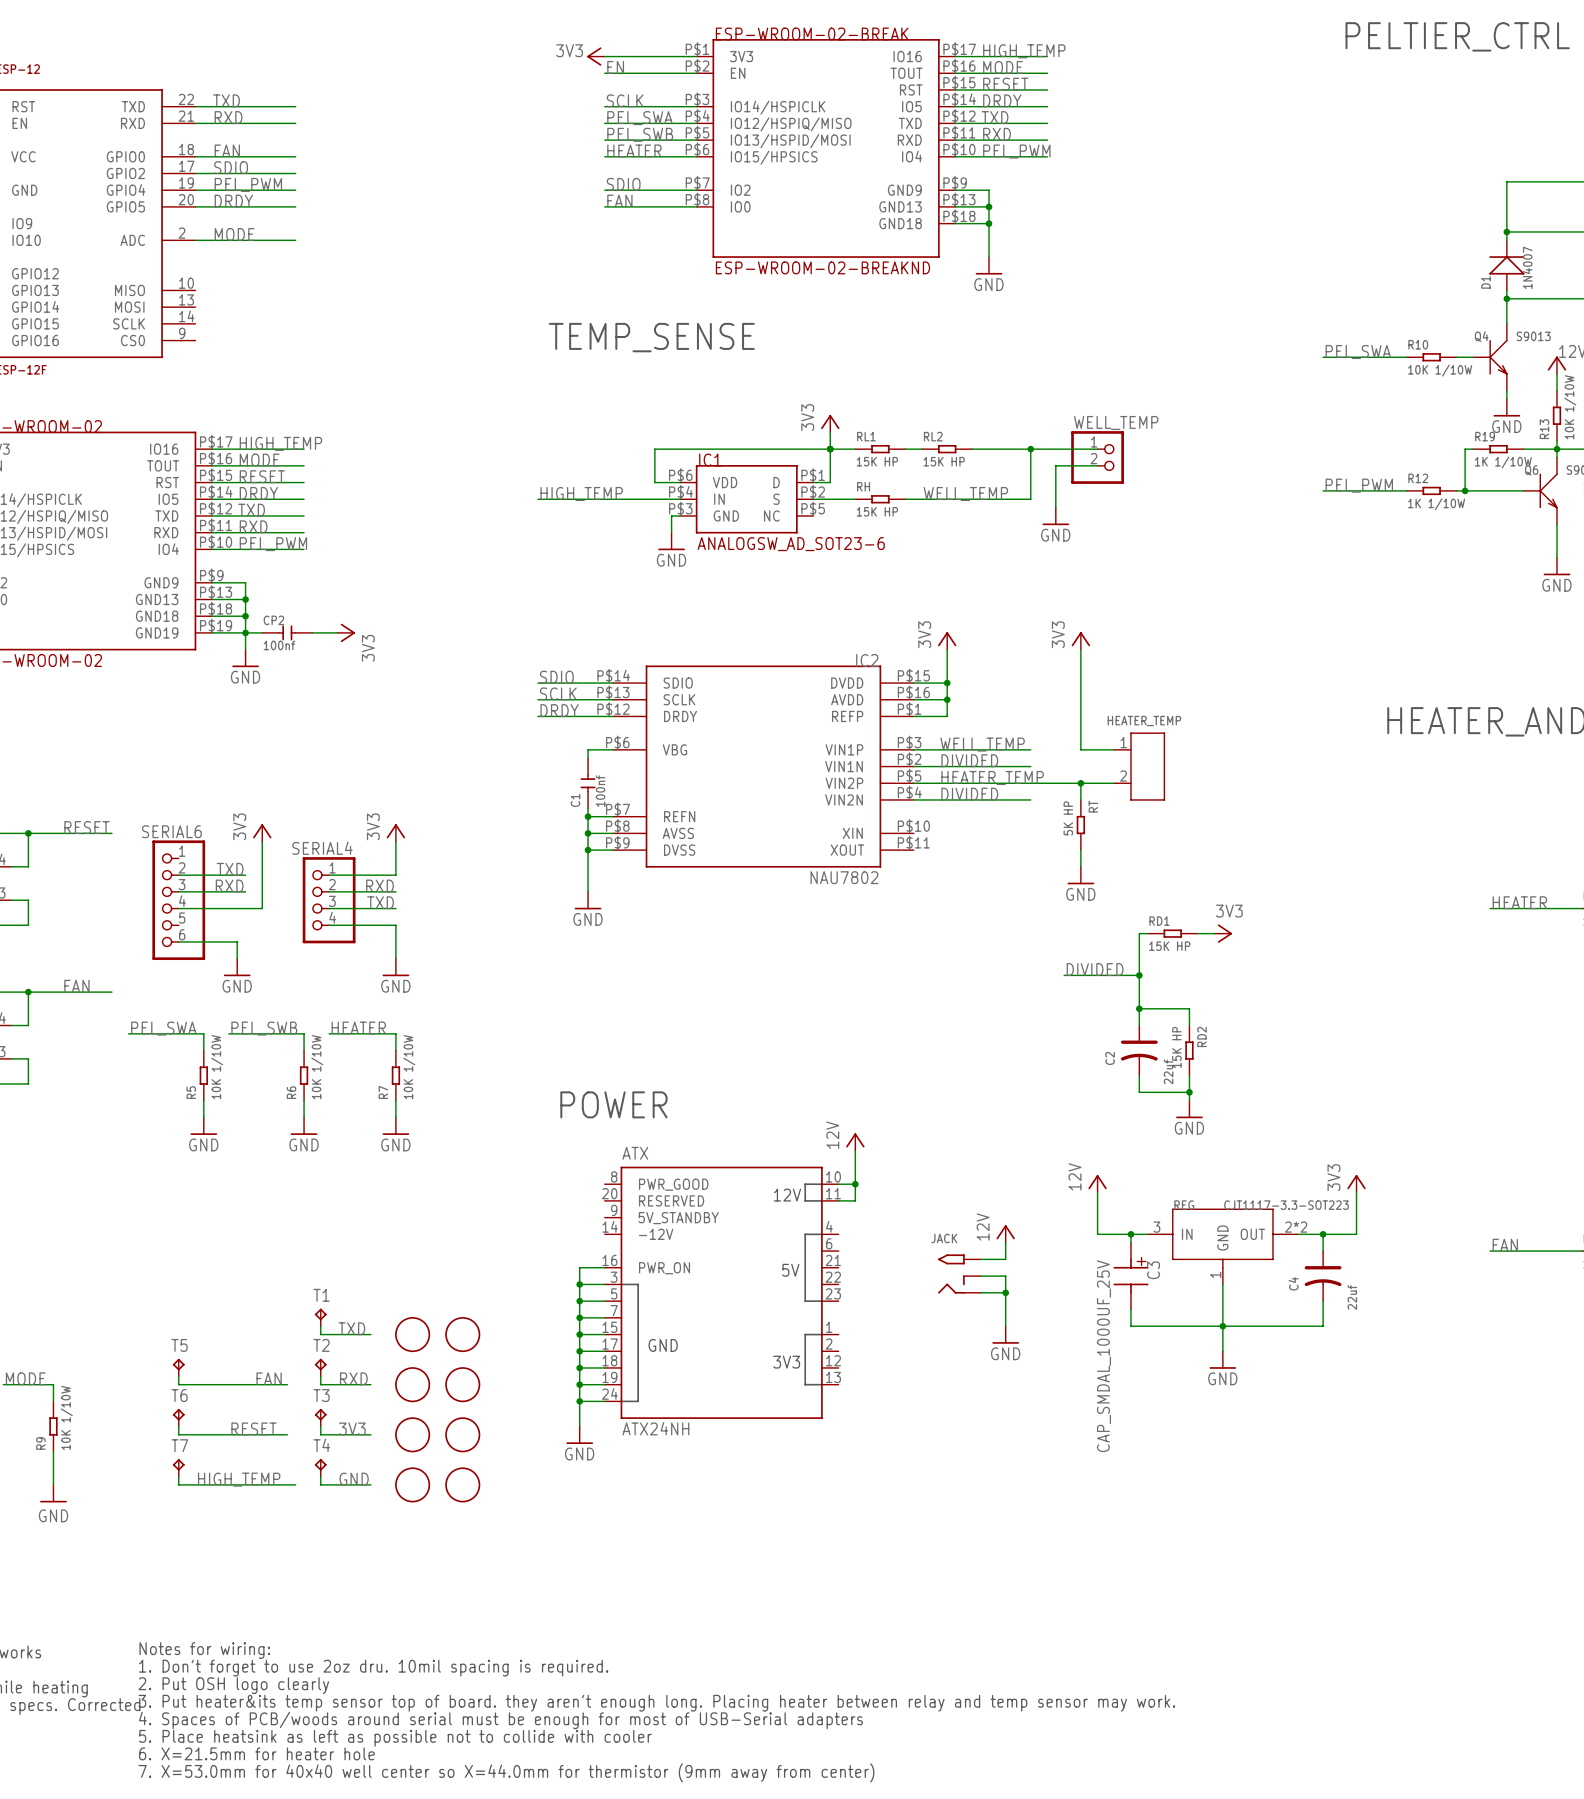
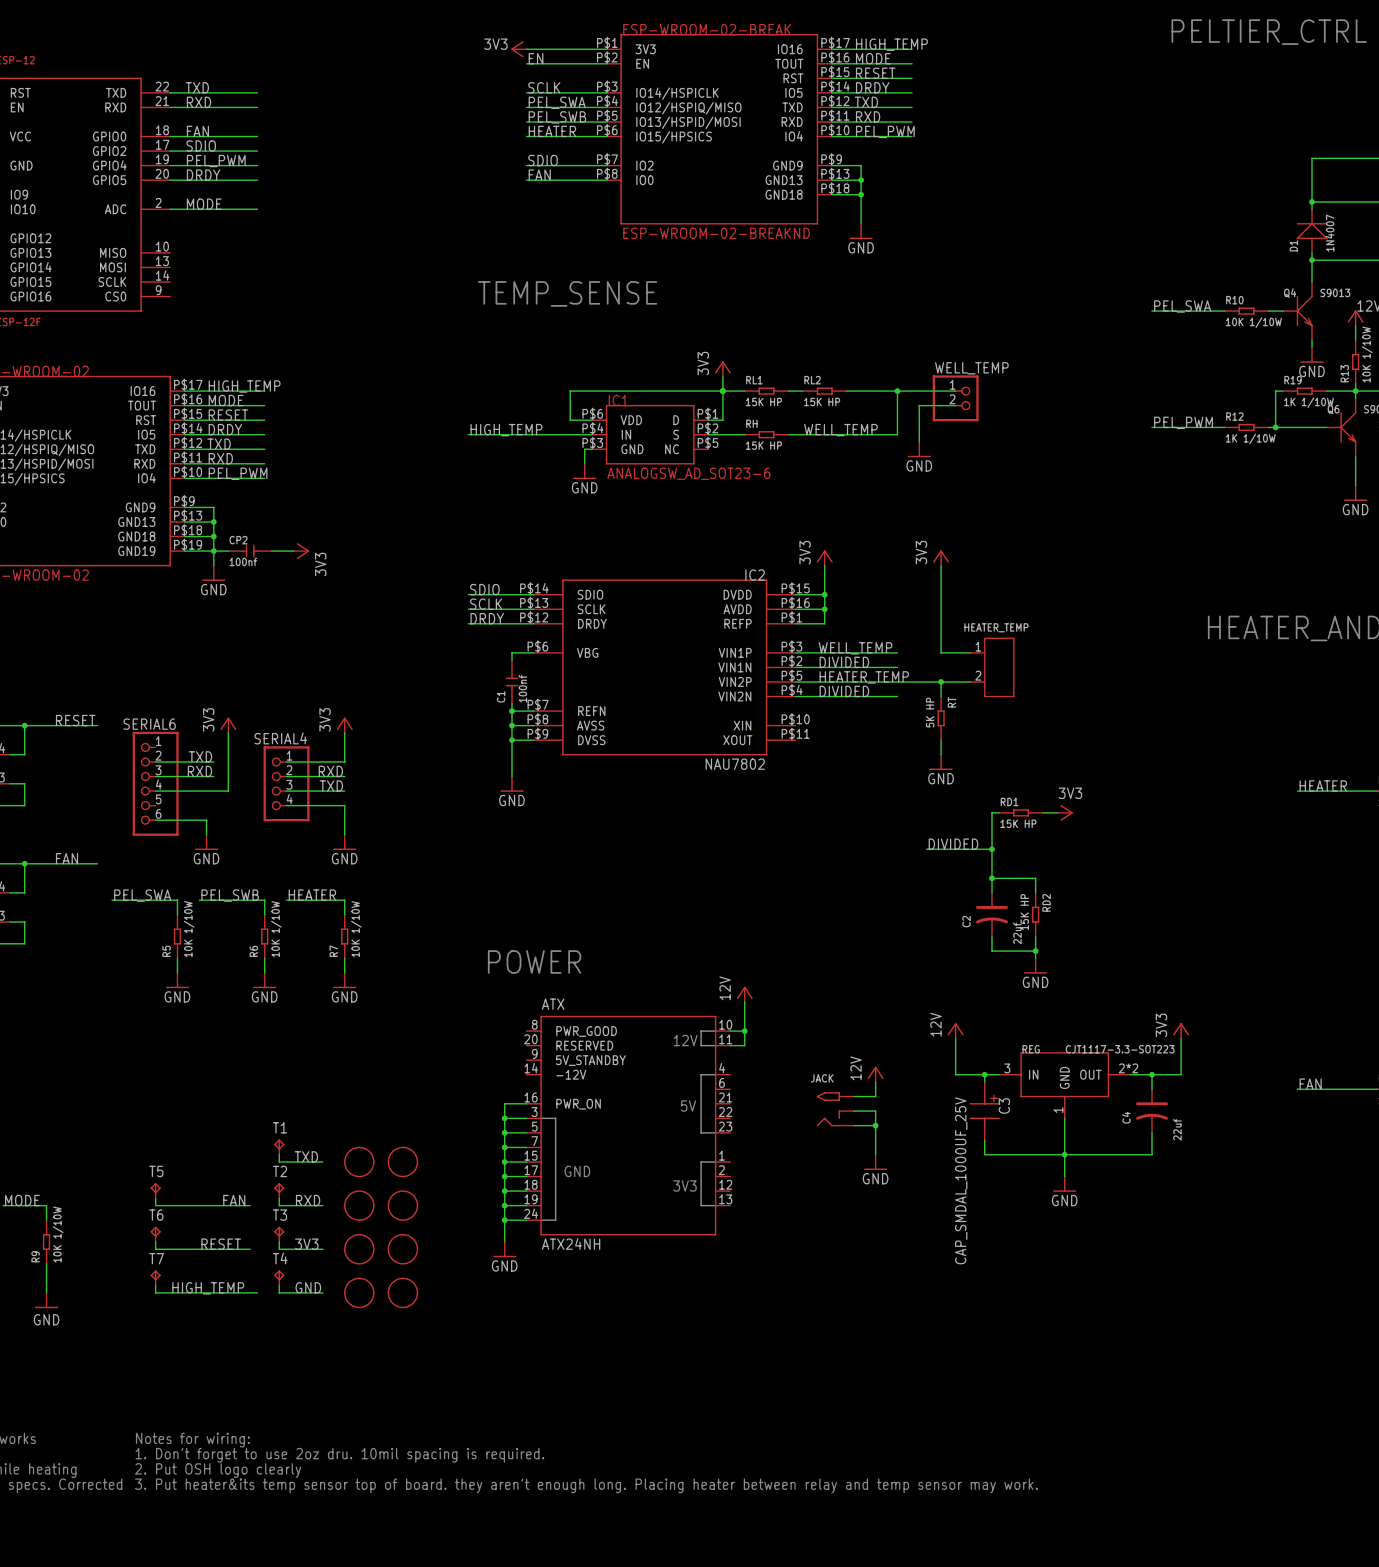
text position: Notes for wiring: (204, 1650) -> Notes for wiring: (192, 1440)
text position: 1. Don't forget to use 2oz dru. 10mil spacing is required. (373, 1668) -> 1. Don't forget to use 2oz dru. 10mil spacing is required. (339, 1455)
text position: 2. Put OSH logo clearly (233, 1685) -> 2. Put OSH logo clearly (218, 1470)
text position: 3. Put heater&its temp sensor top of board. they aren't enough long. Placing heater between relay and temp sensor may work. (656, 1703) -> 3. Put heater&its temp sensor top of board. they aren't enough long. Placing heater between relay and temp sensor may work. (586, 1485)
text: 4. Spaces of PCB/woods around serial must be enough for most of USB-Serial adapters (500, 1720) -> none
text: 5. Place heatsink as left as possible not to collide with cooler (395, 1738) -> none
text: 6. X=21.5mm for heater hole (256, 1753) -> none
text: 7. X=53.0mm for 40x40 well center so X=44.0mm for thermistor (9mm away from center) (506, 1772) -> none

